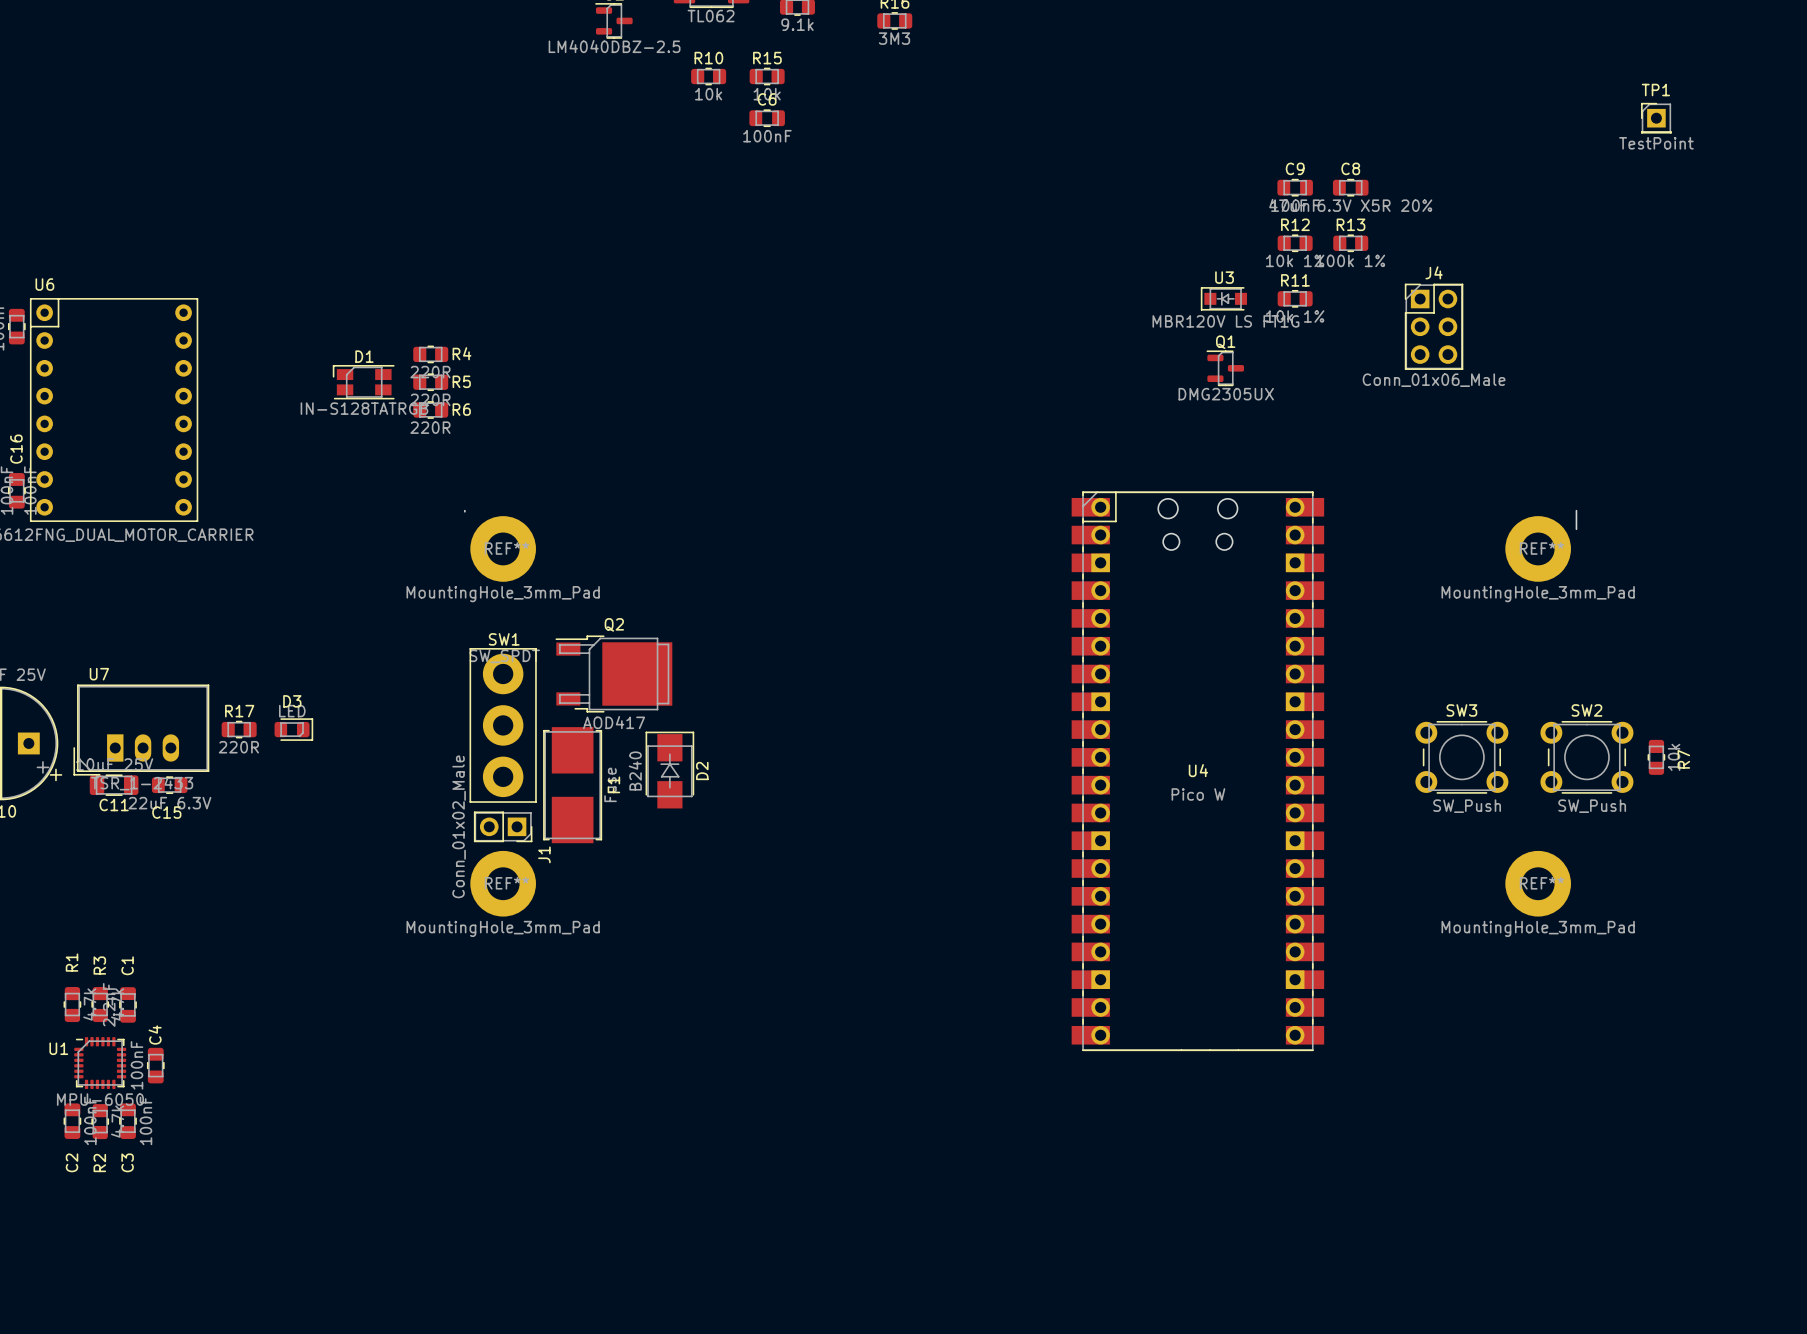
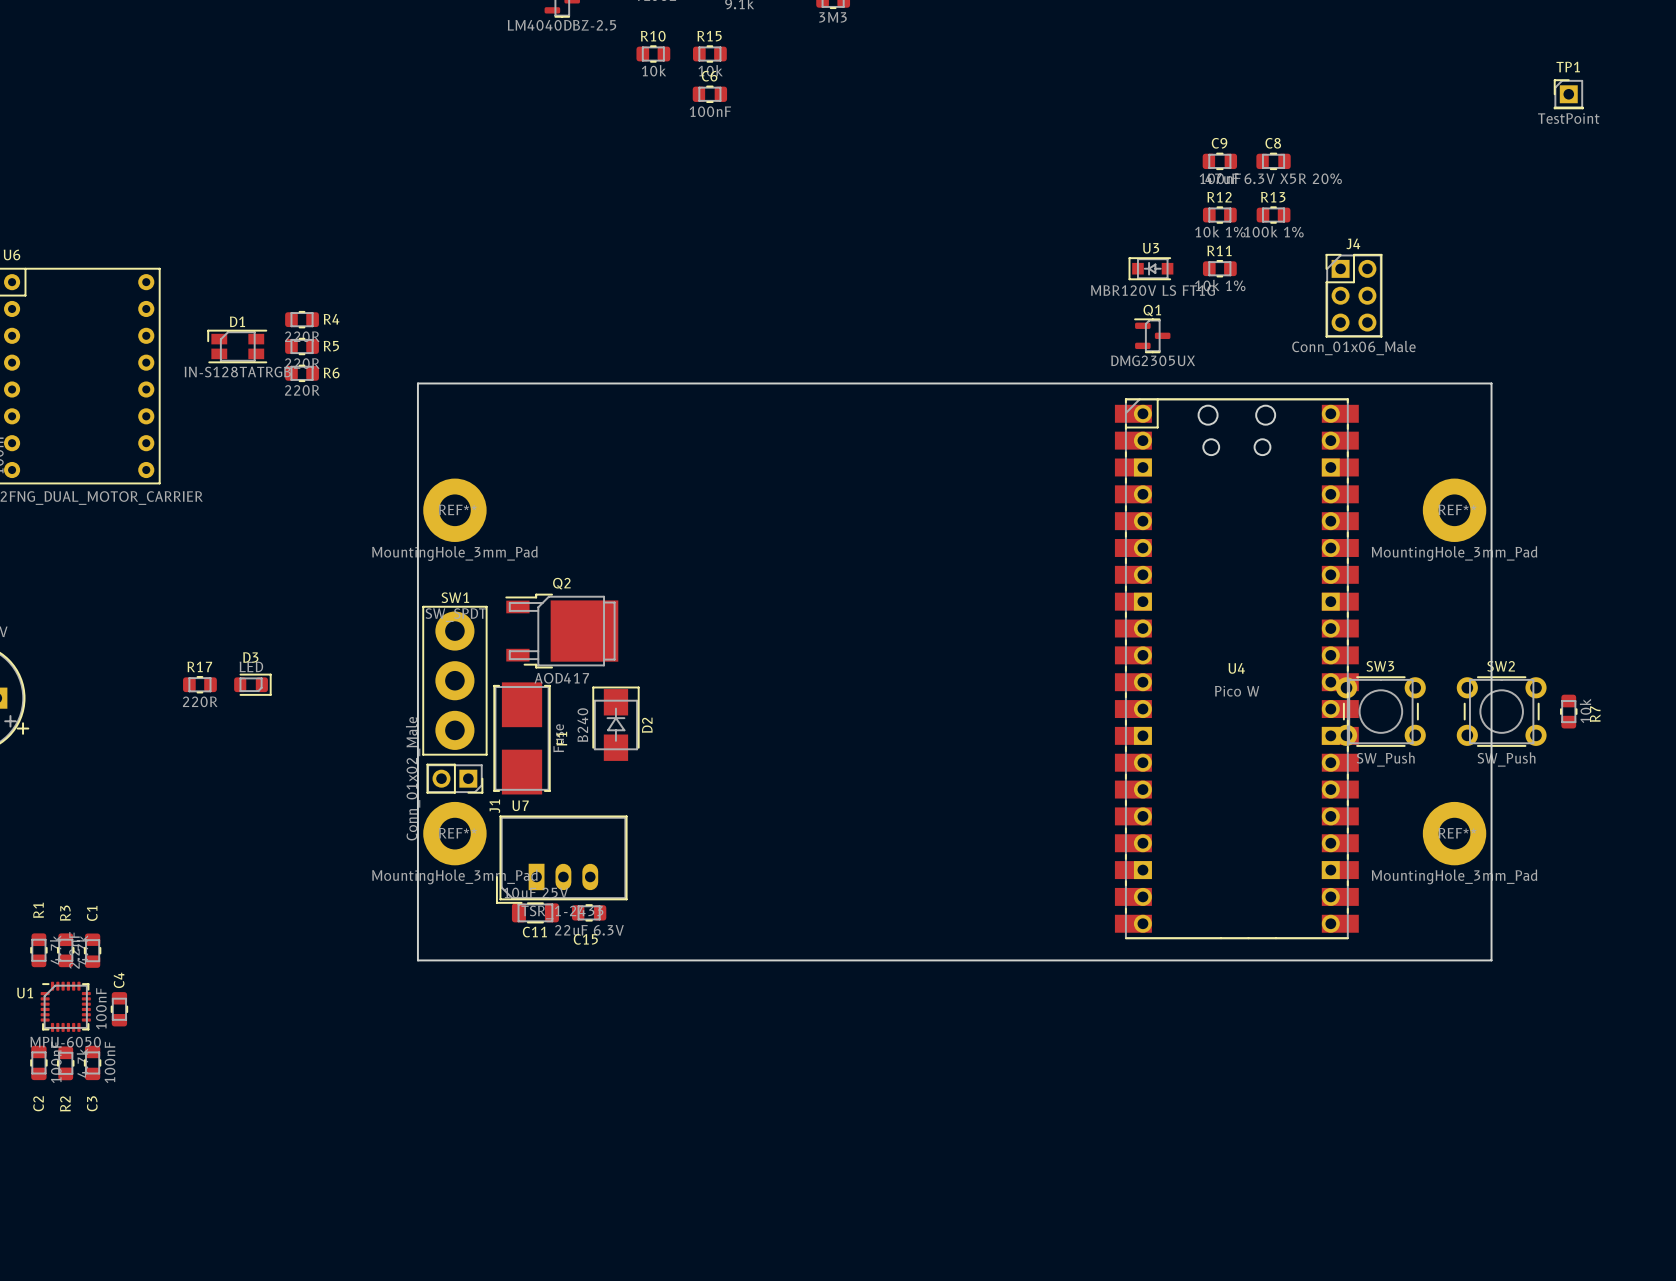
R4 position: (430, 354) -> (302, 319)
D1 position: (363, 382) -> (237, 346)
R5 position: (430, 382) -> (302, 346)
R6 position: (430, 410) -> (302, 373)
board edge: none -> (417, 473) (417, 383) (1491, 383) (1491, 473)
board edge: none -> (417, 474) (417, 960) (1491, 960) (1491, 491)
U7 position: (141, 730) -> (561, 859)
U4 position: (1197, 771) -> (1236, 668)
C11 position: (114, 785) -> (535, 912)
C15 position: (169, 785) -> (589, 912)

